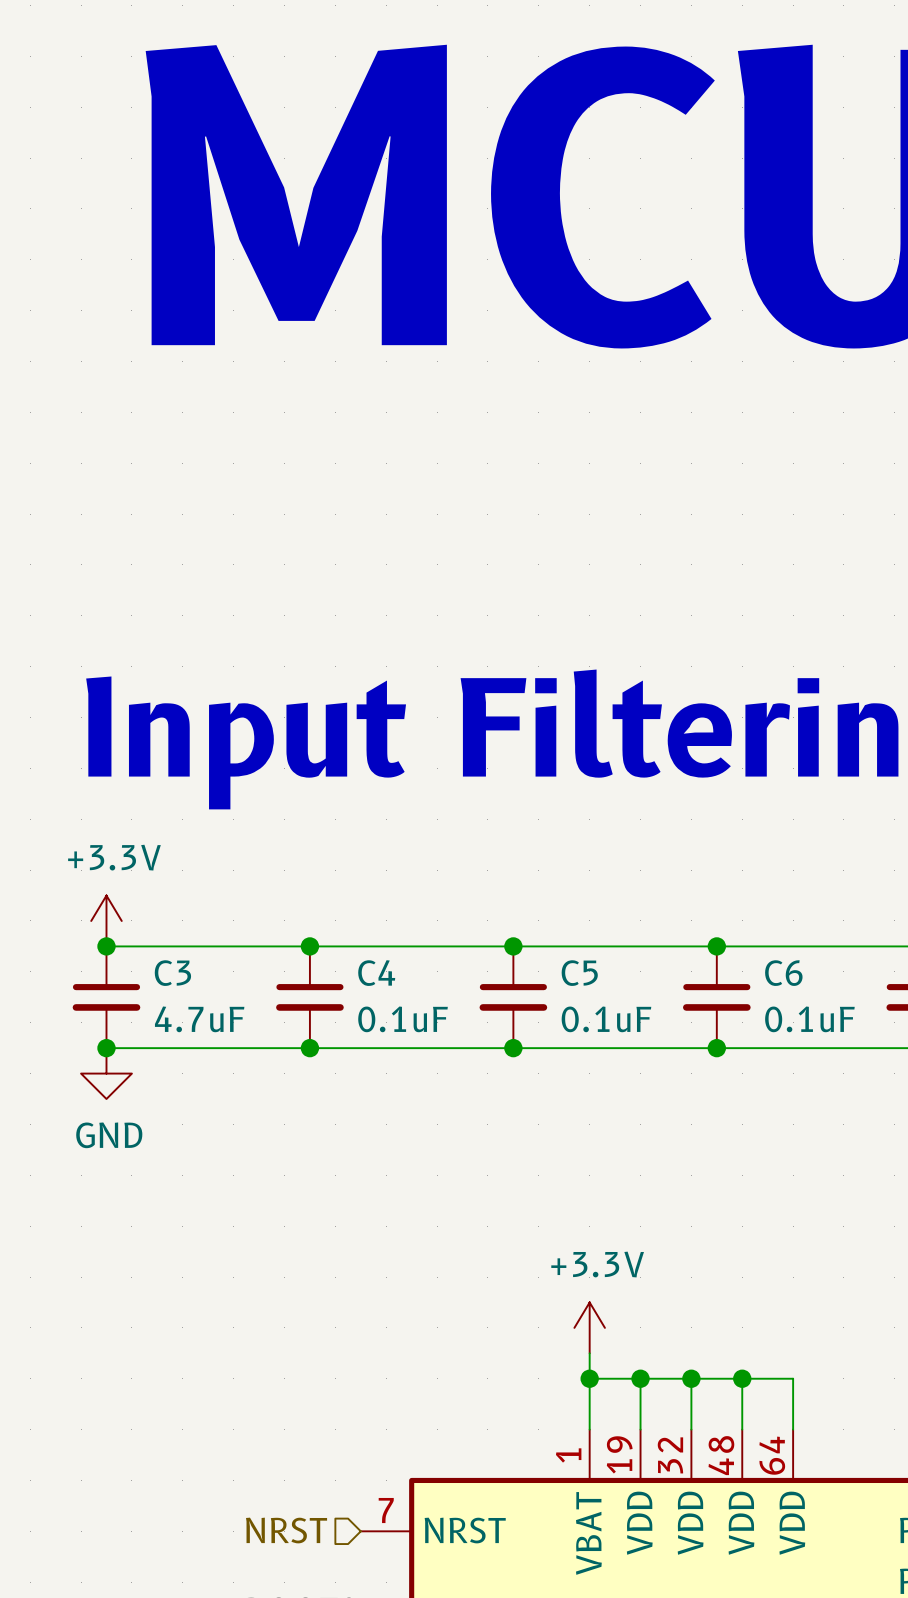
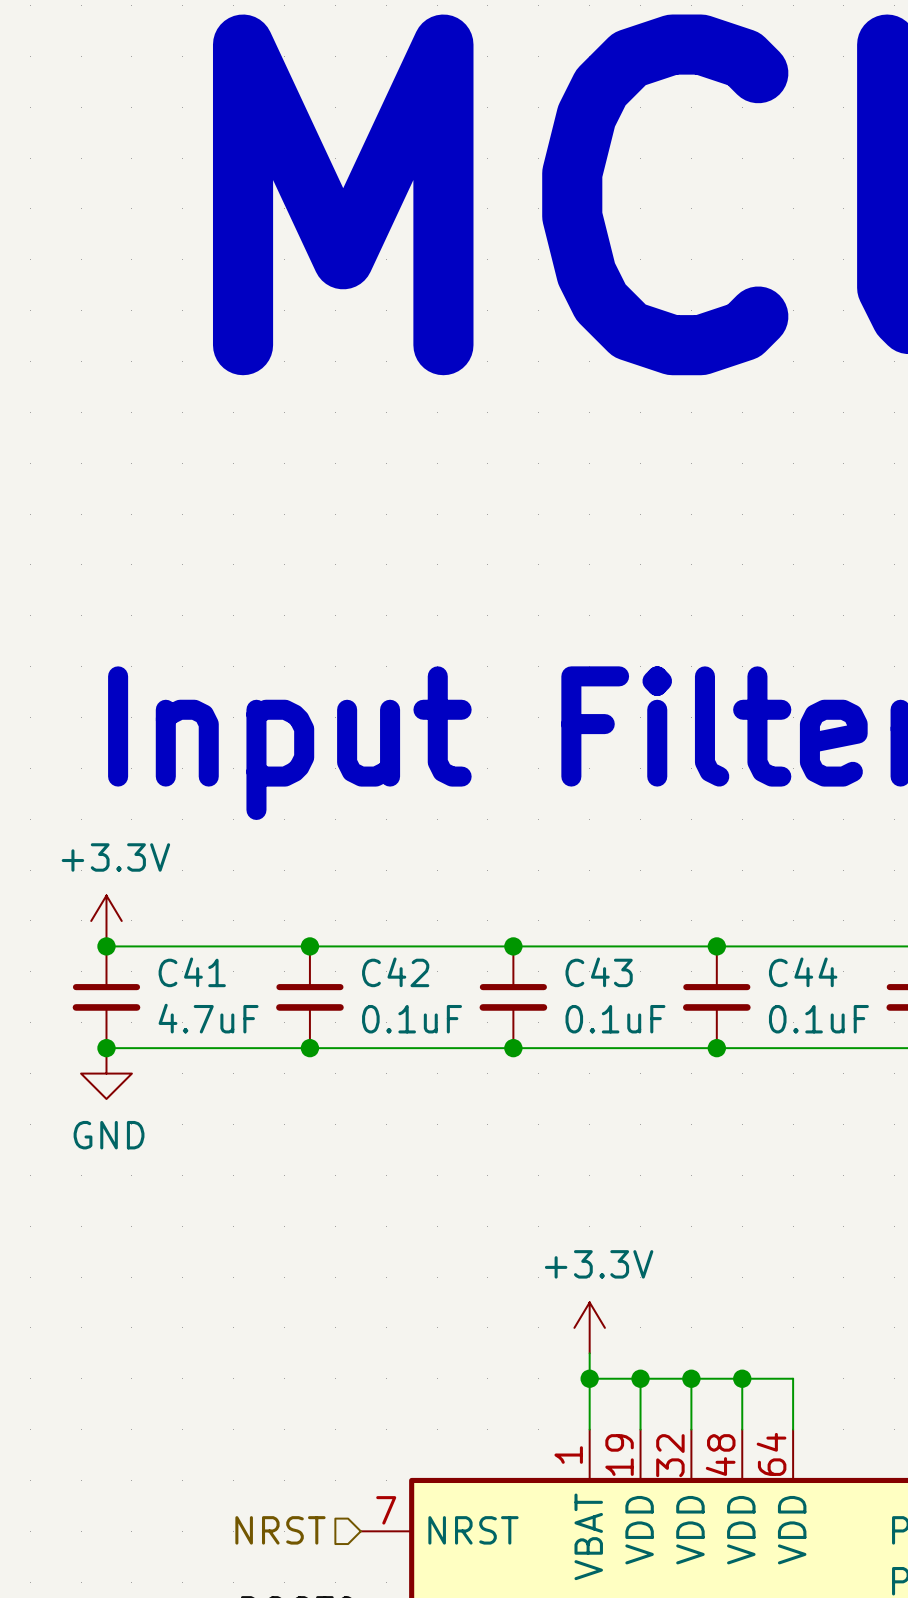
C3 name: C3 (172, 973) -> C41 (192, 972)
C4 name: C4 (376, 973) -> C42 (395, 972)
C5 name: C5 (579, 973) -> C43 (599, 972)
C6 name: C6 (783, 973) -> C44 (803, 972)

